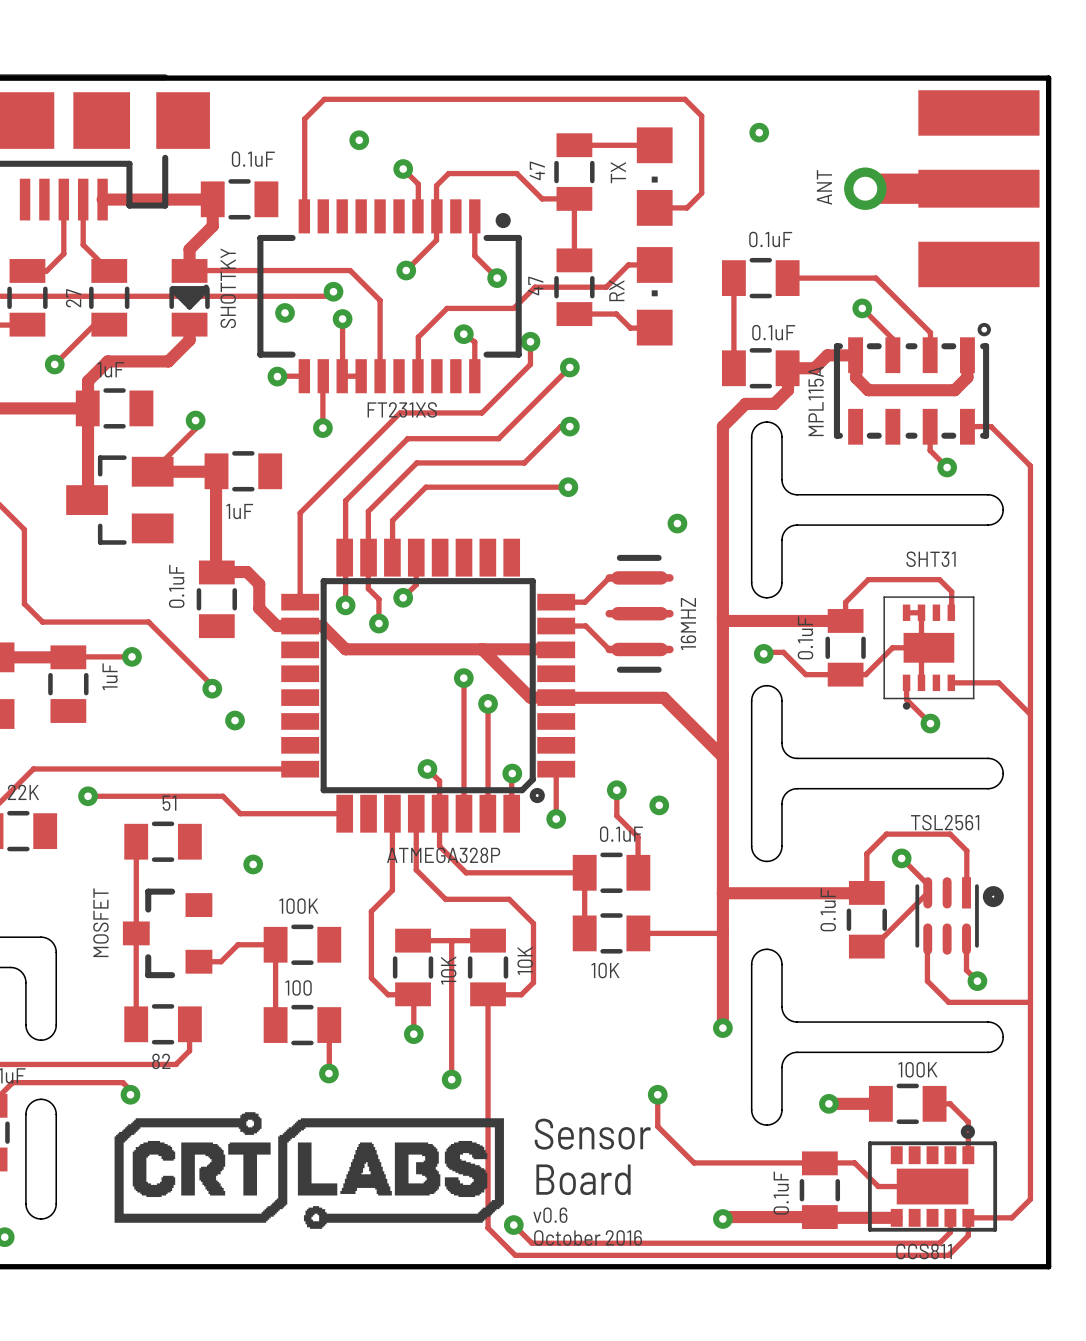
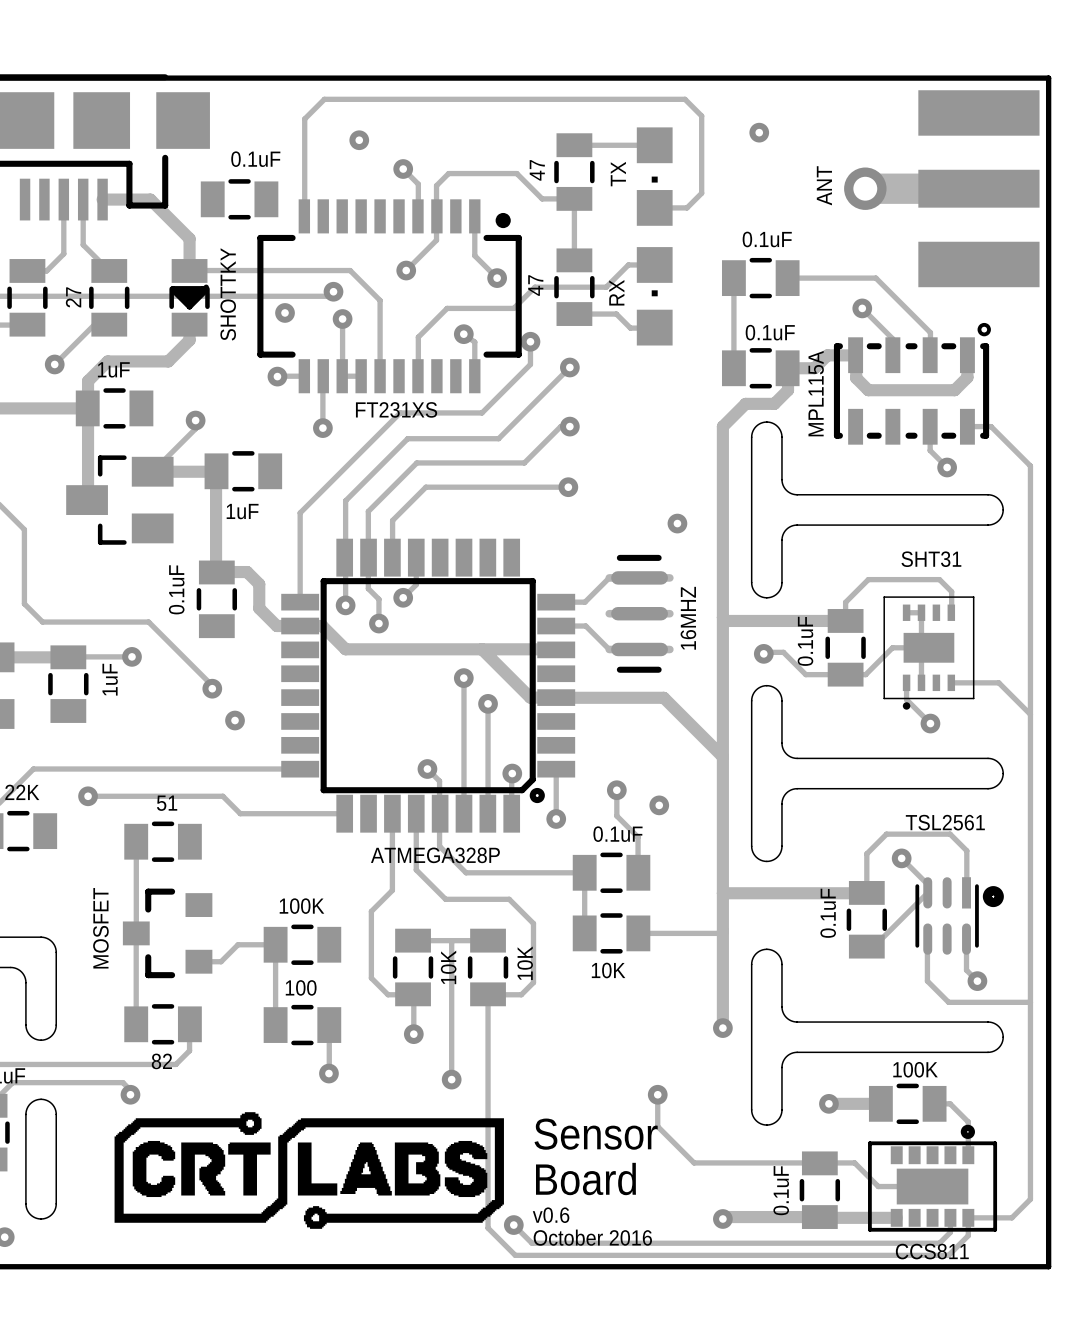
track: (150, 199) (212, 199) -> (150, 199) (189, 238) (189, 249)
track: (212, 199) (212, 226) (189, 249) -> none
via: (253, 864) -> none

